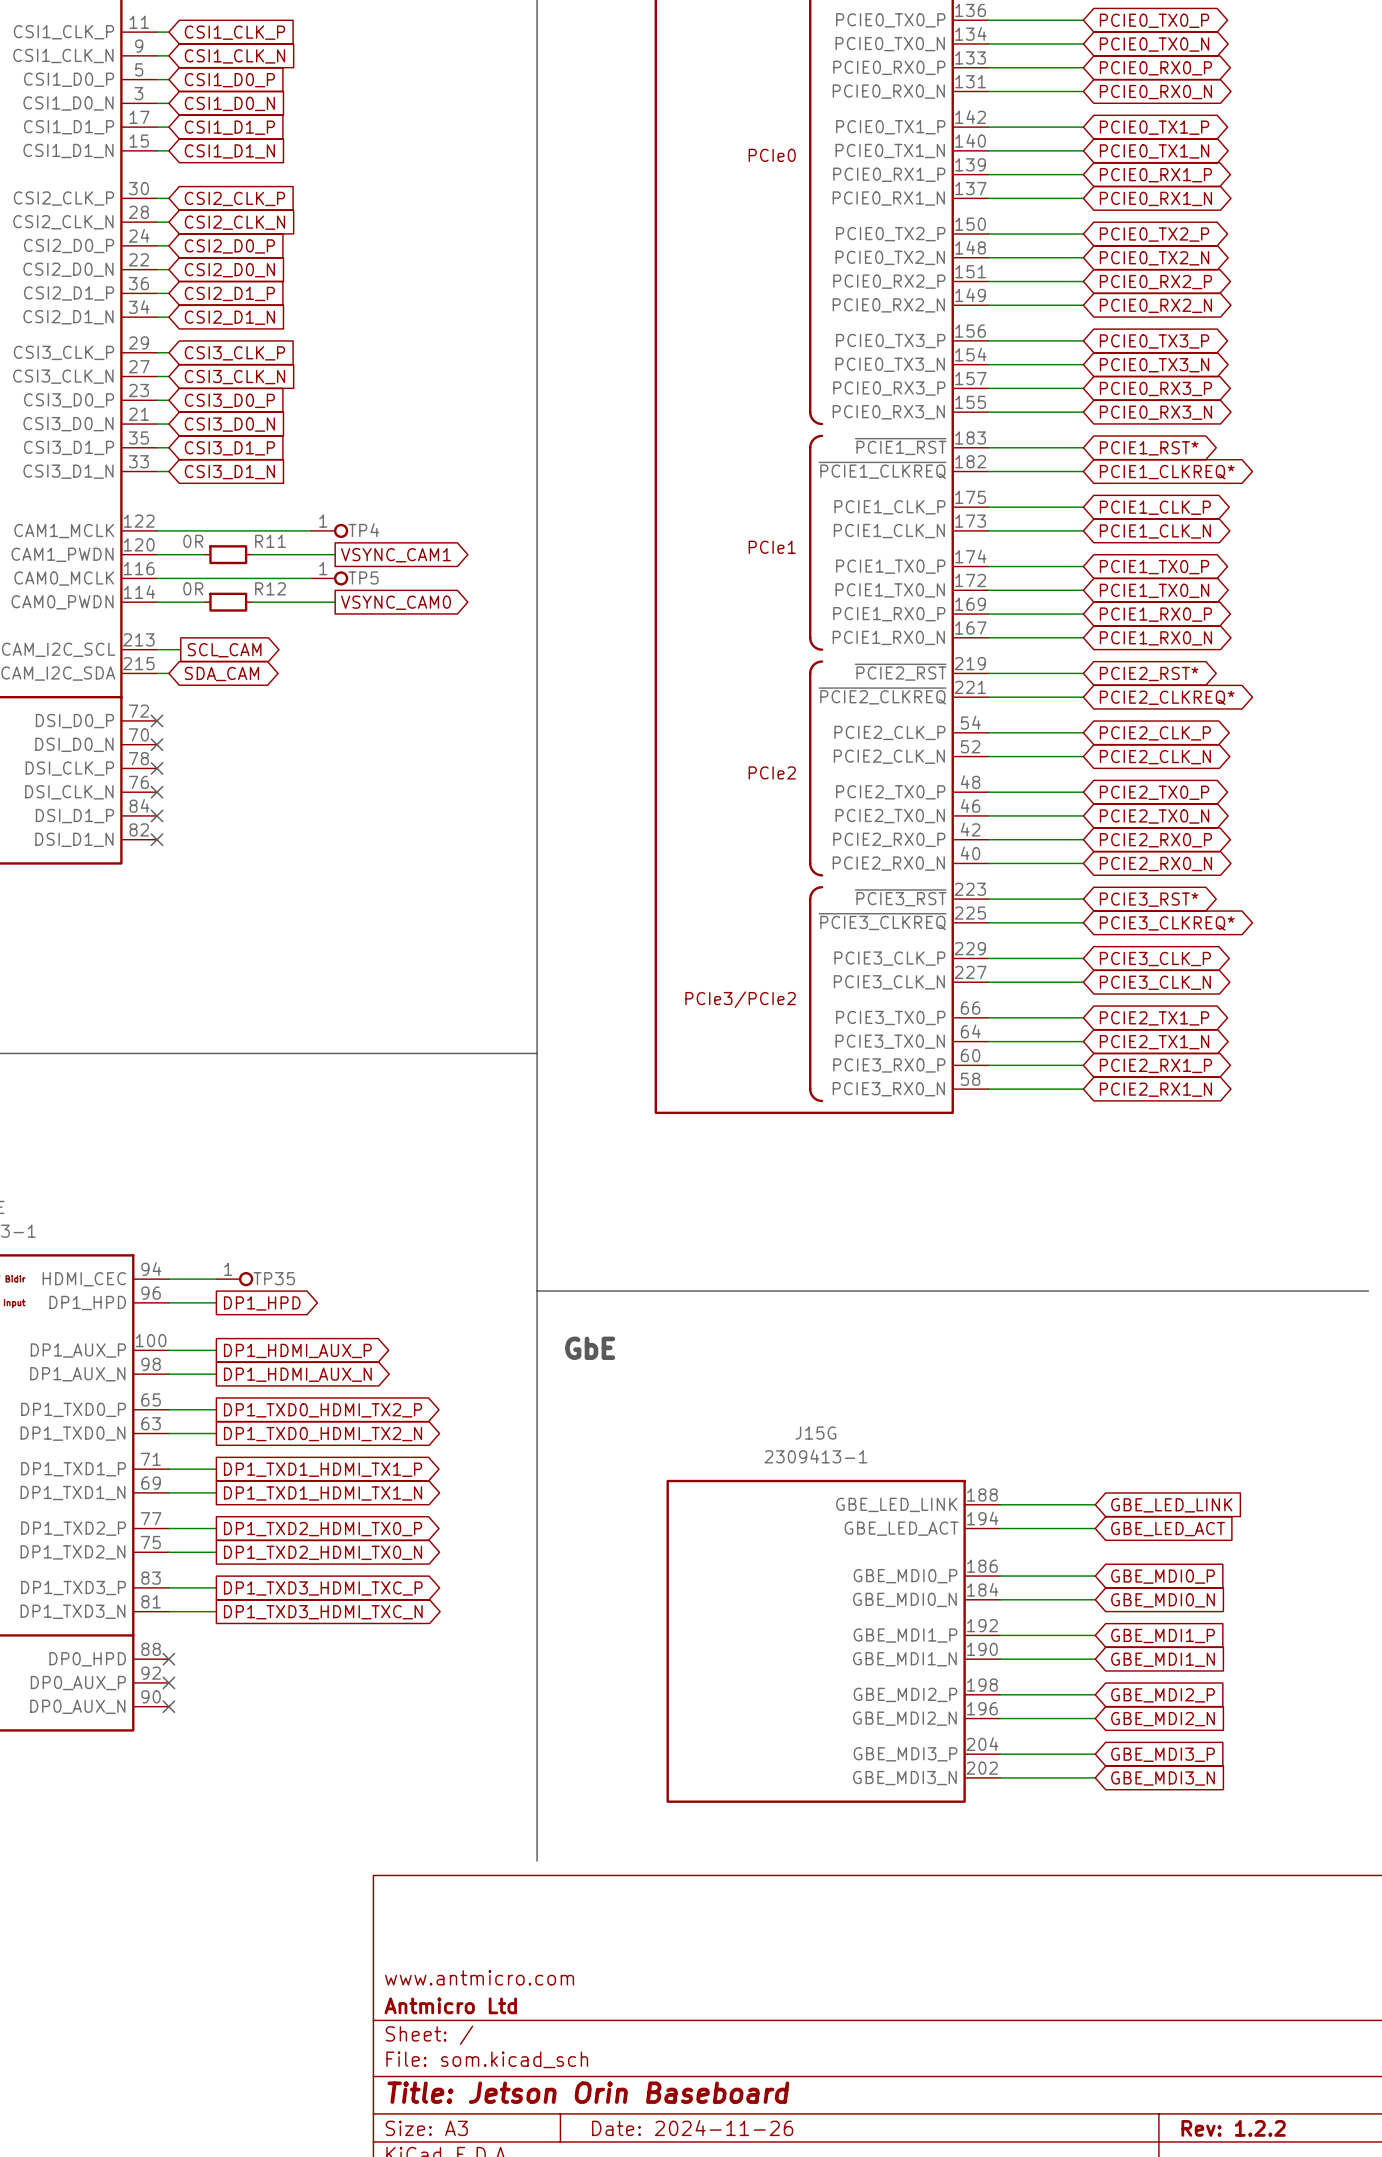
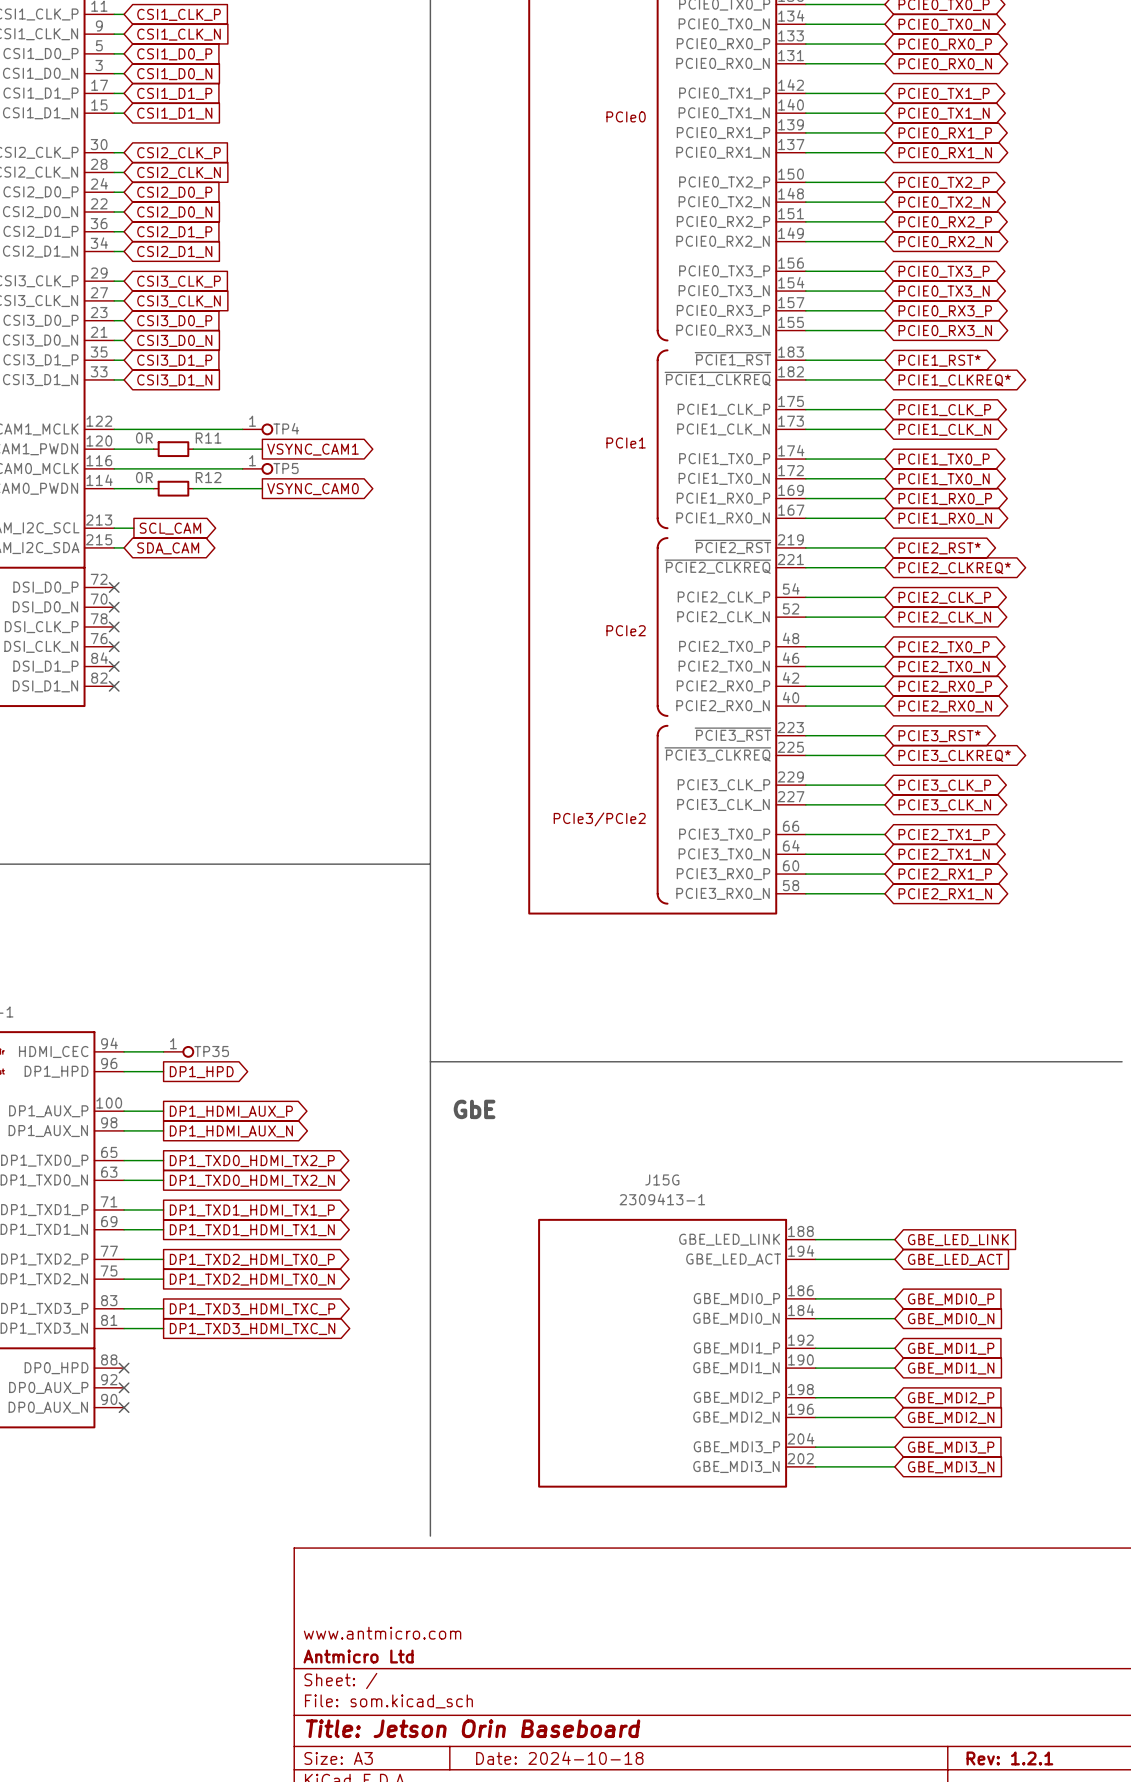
title block: Date: 2024-11-26 (692, 2128) -> Date: 2024-10-18 (559, 1758)
title block: Rev: 1.2.2 (1233, 2128) -> Rev: 1.2.1 (1009, 1758)

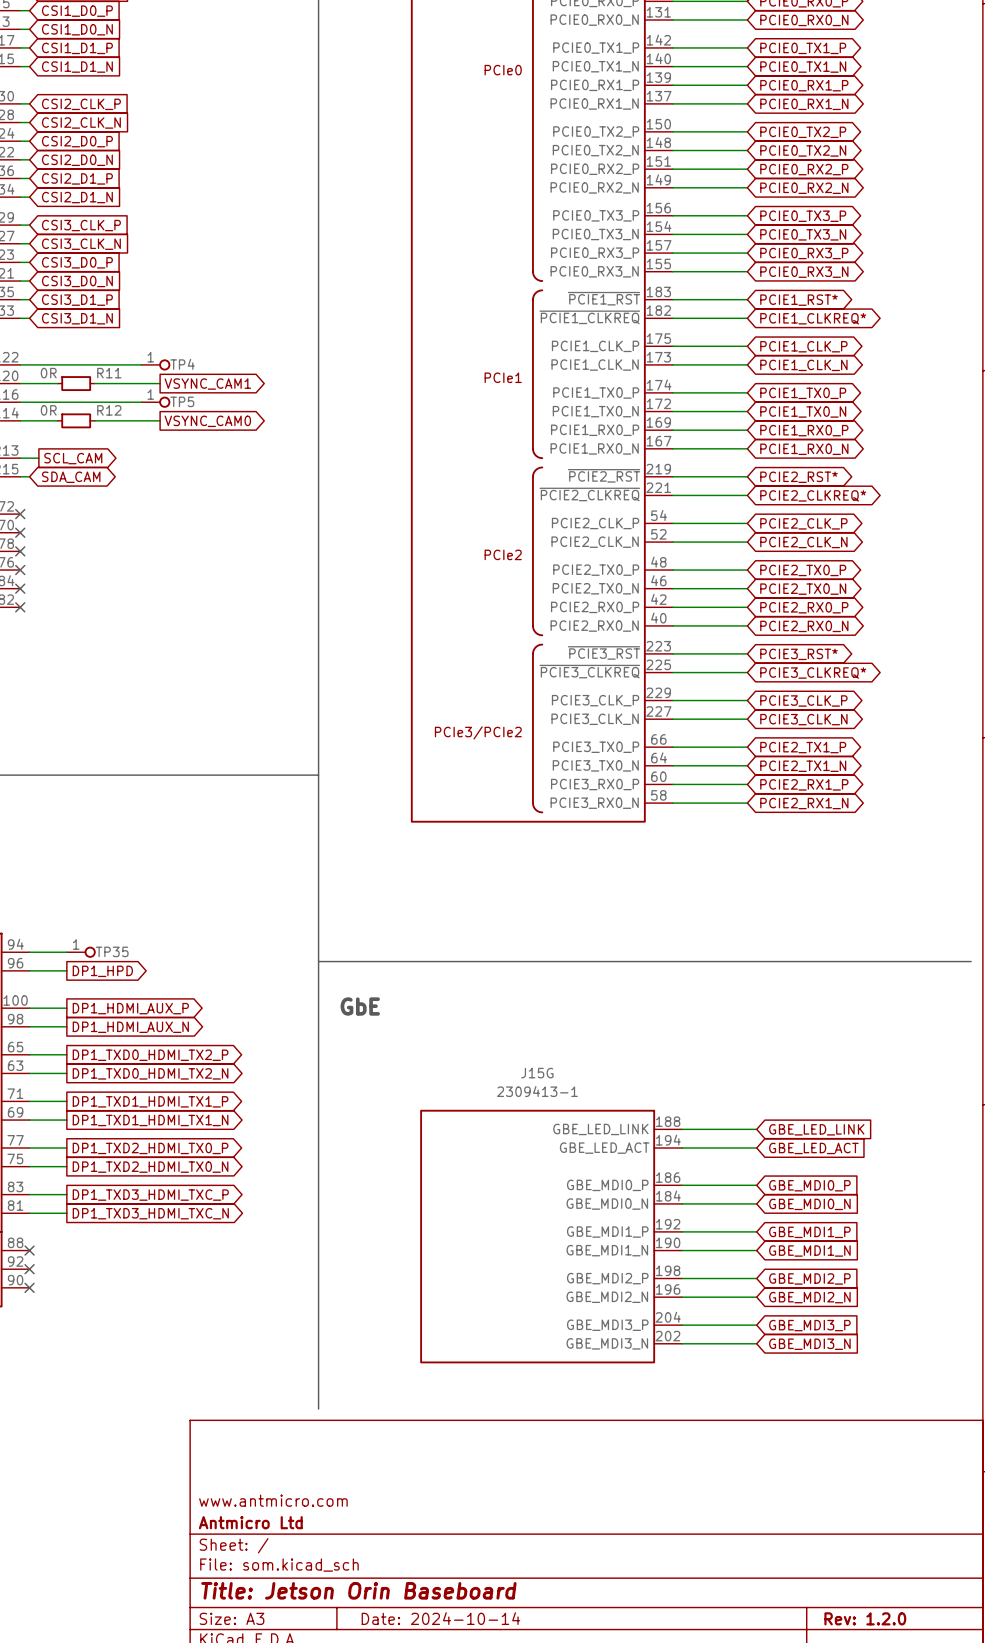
title block: Date: 2024-10-18 (559, 1758) -> Date: 2024-10-14 (440, 1618)
title block: Rev: 1.2.1 (1009, 1758) -> Rev: 1.2.0 (865, 1618)

